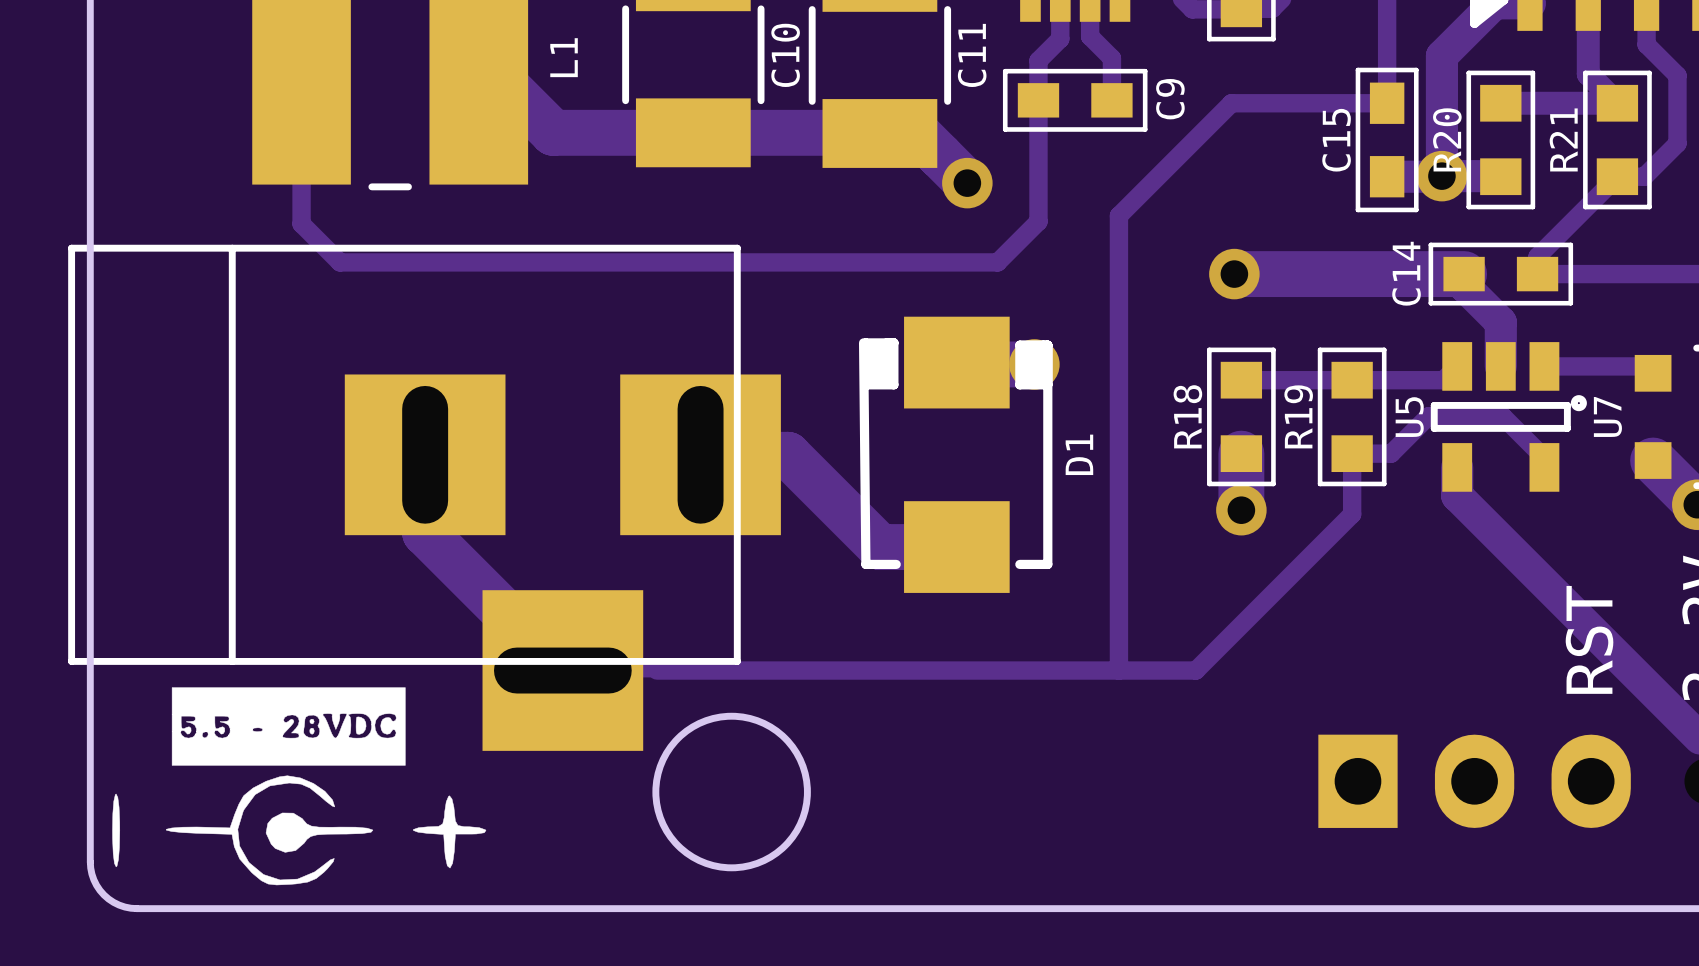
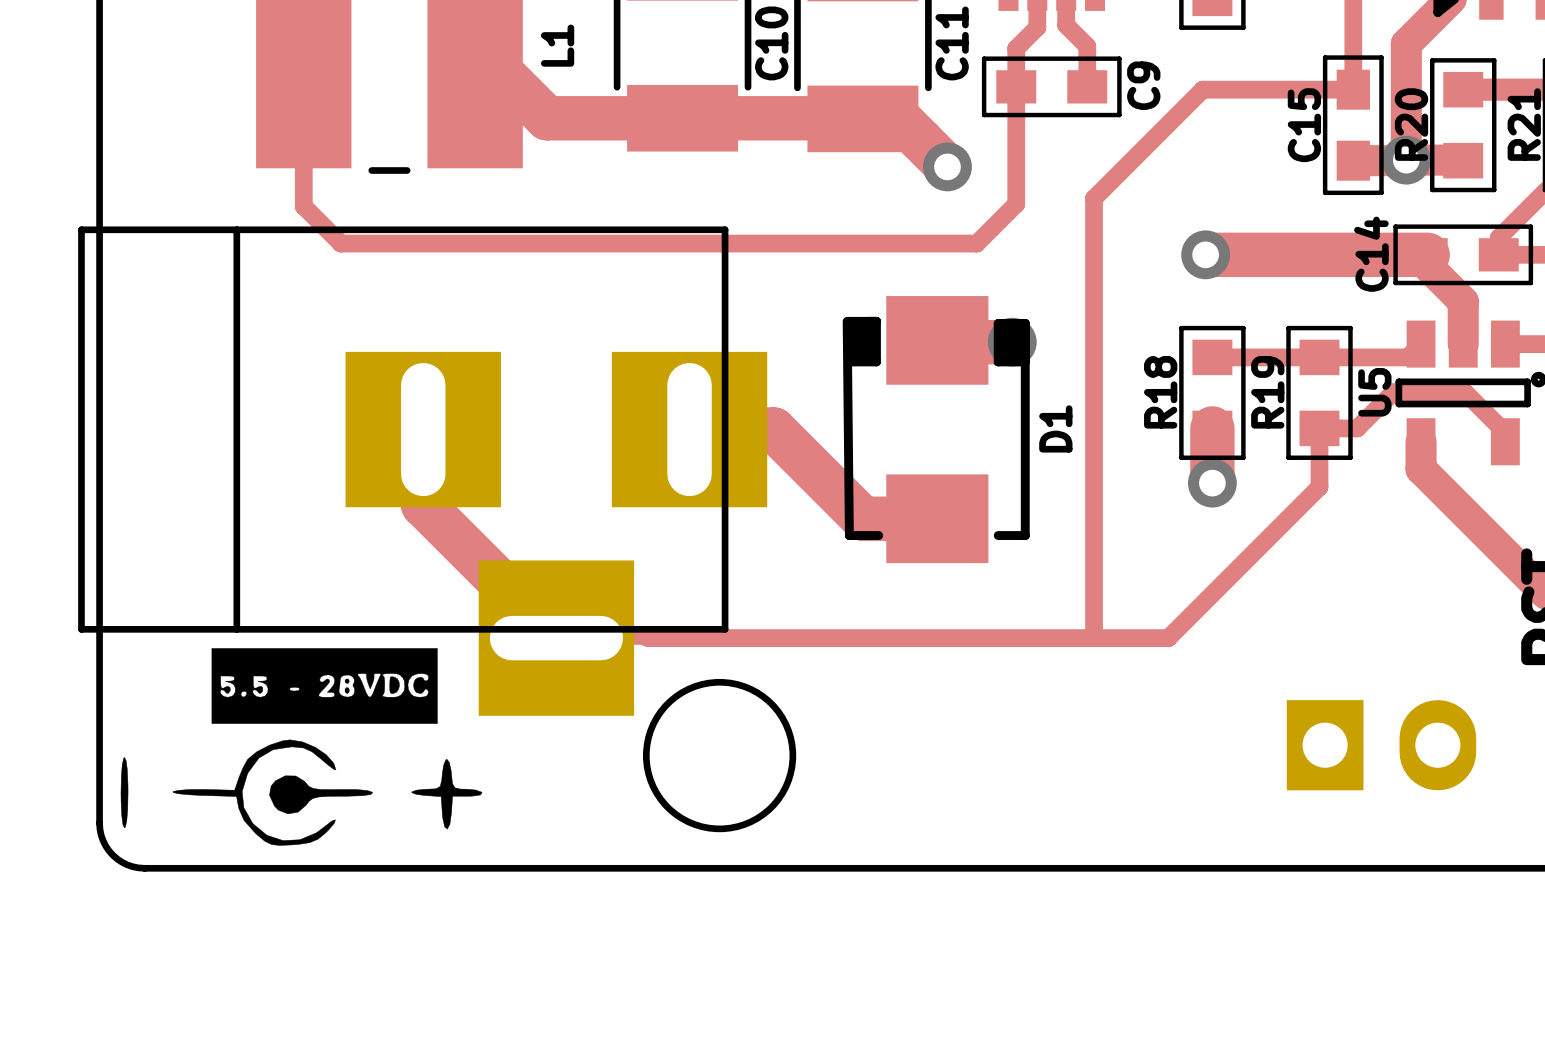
drawing position: (288, 726) -> (324, 686)

